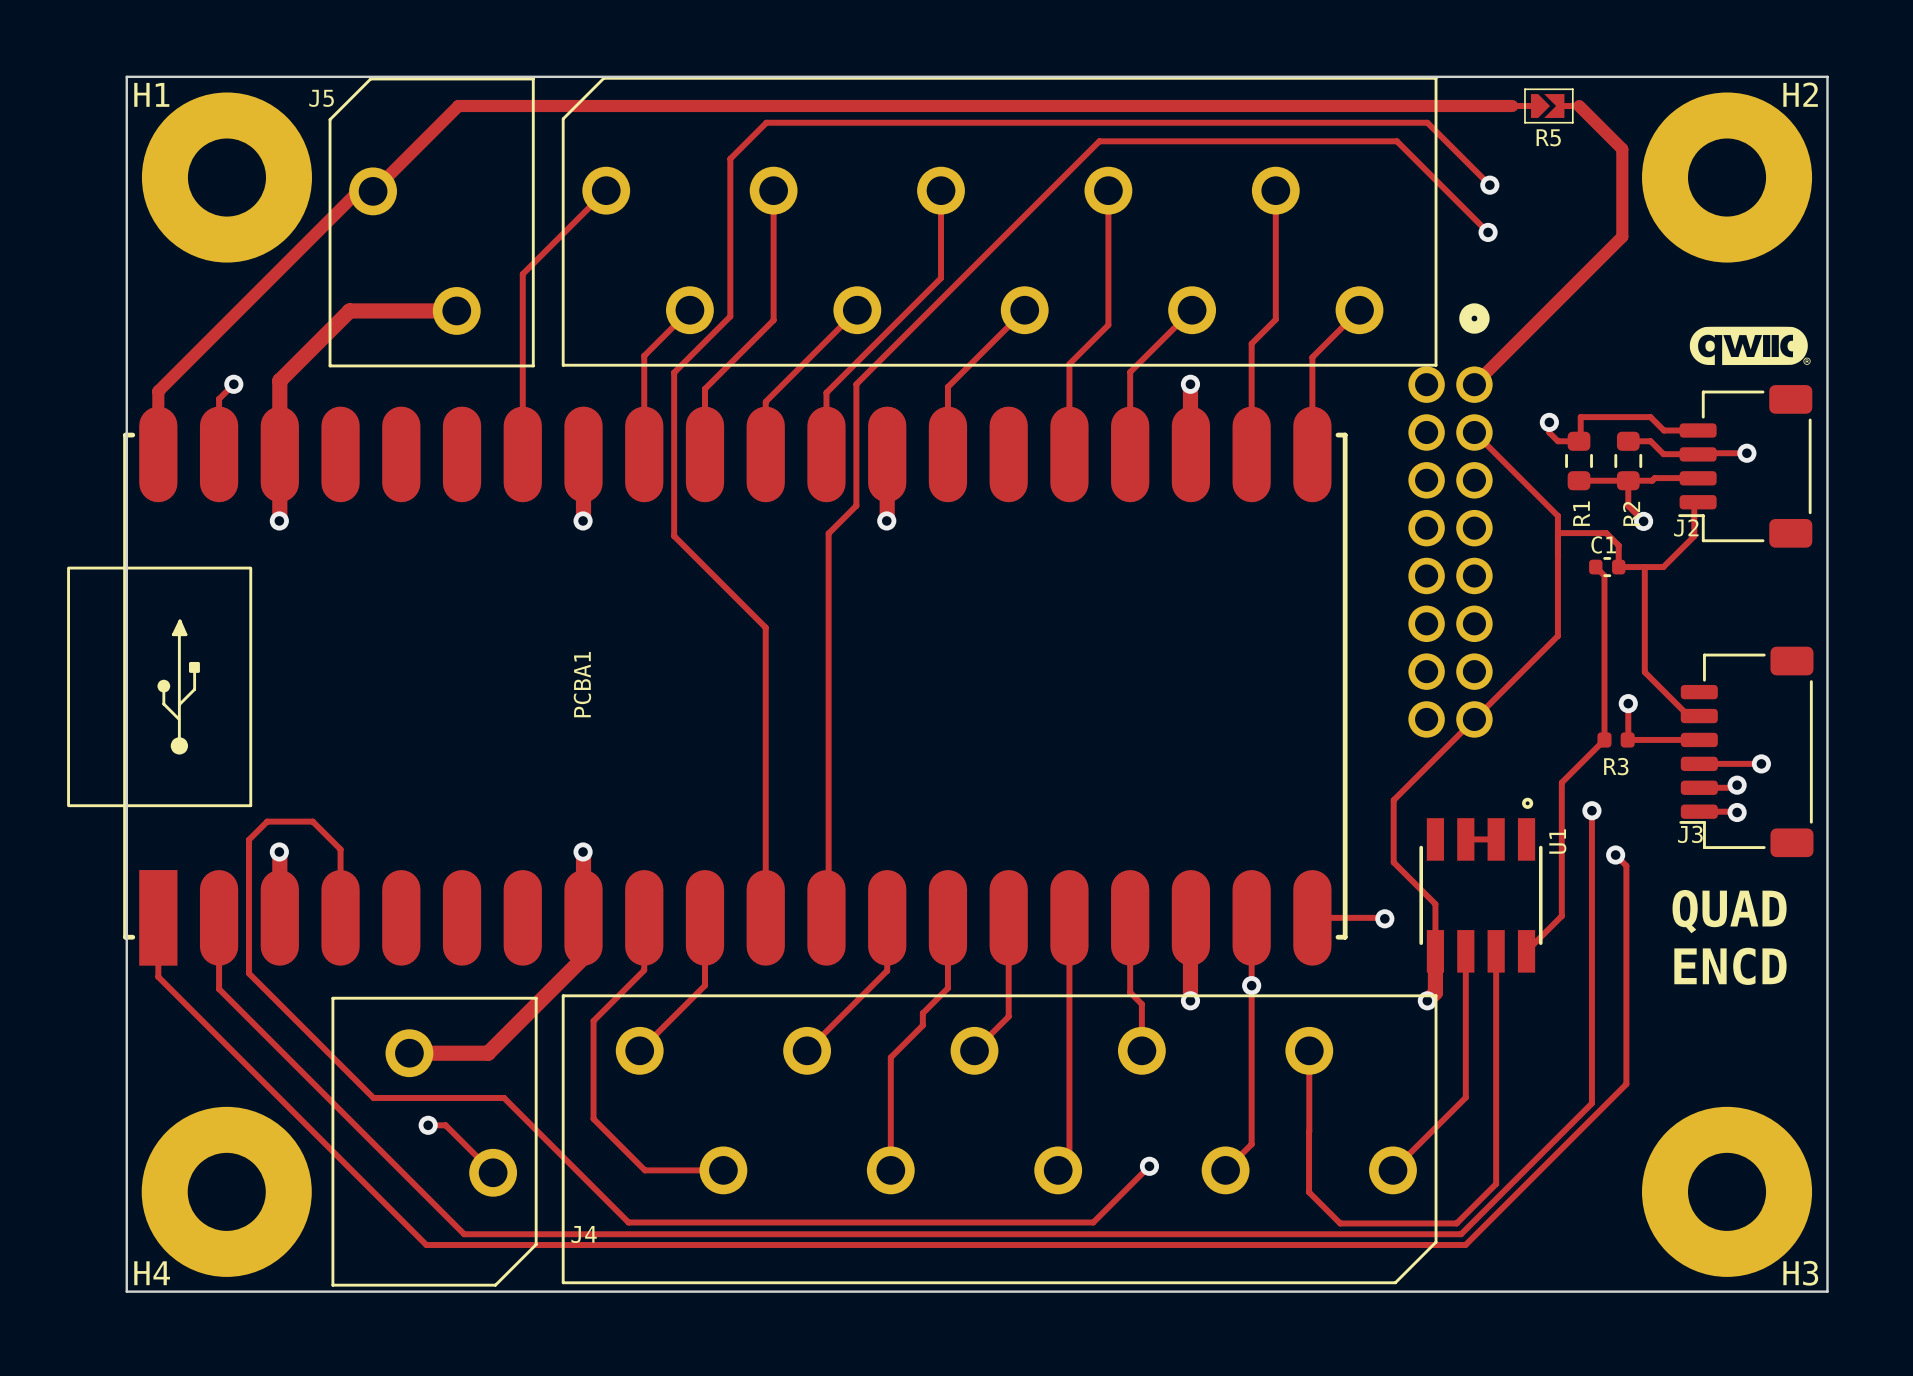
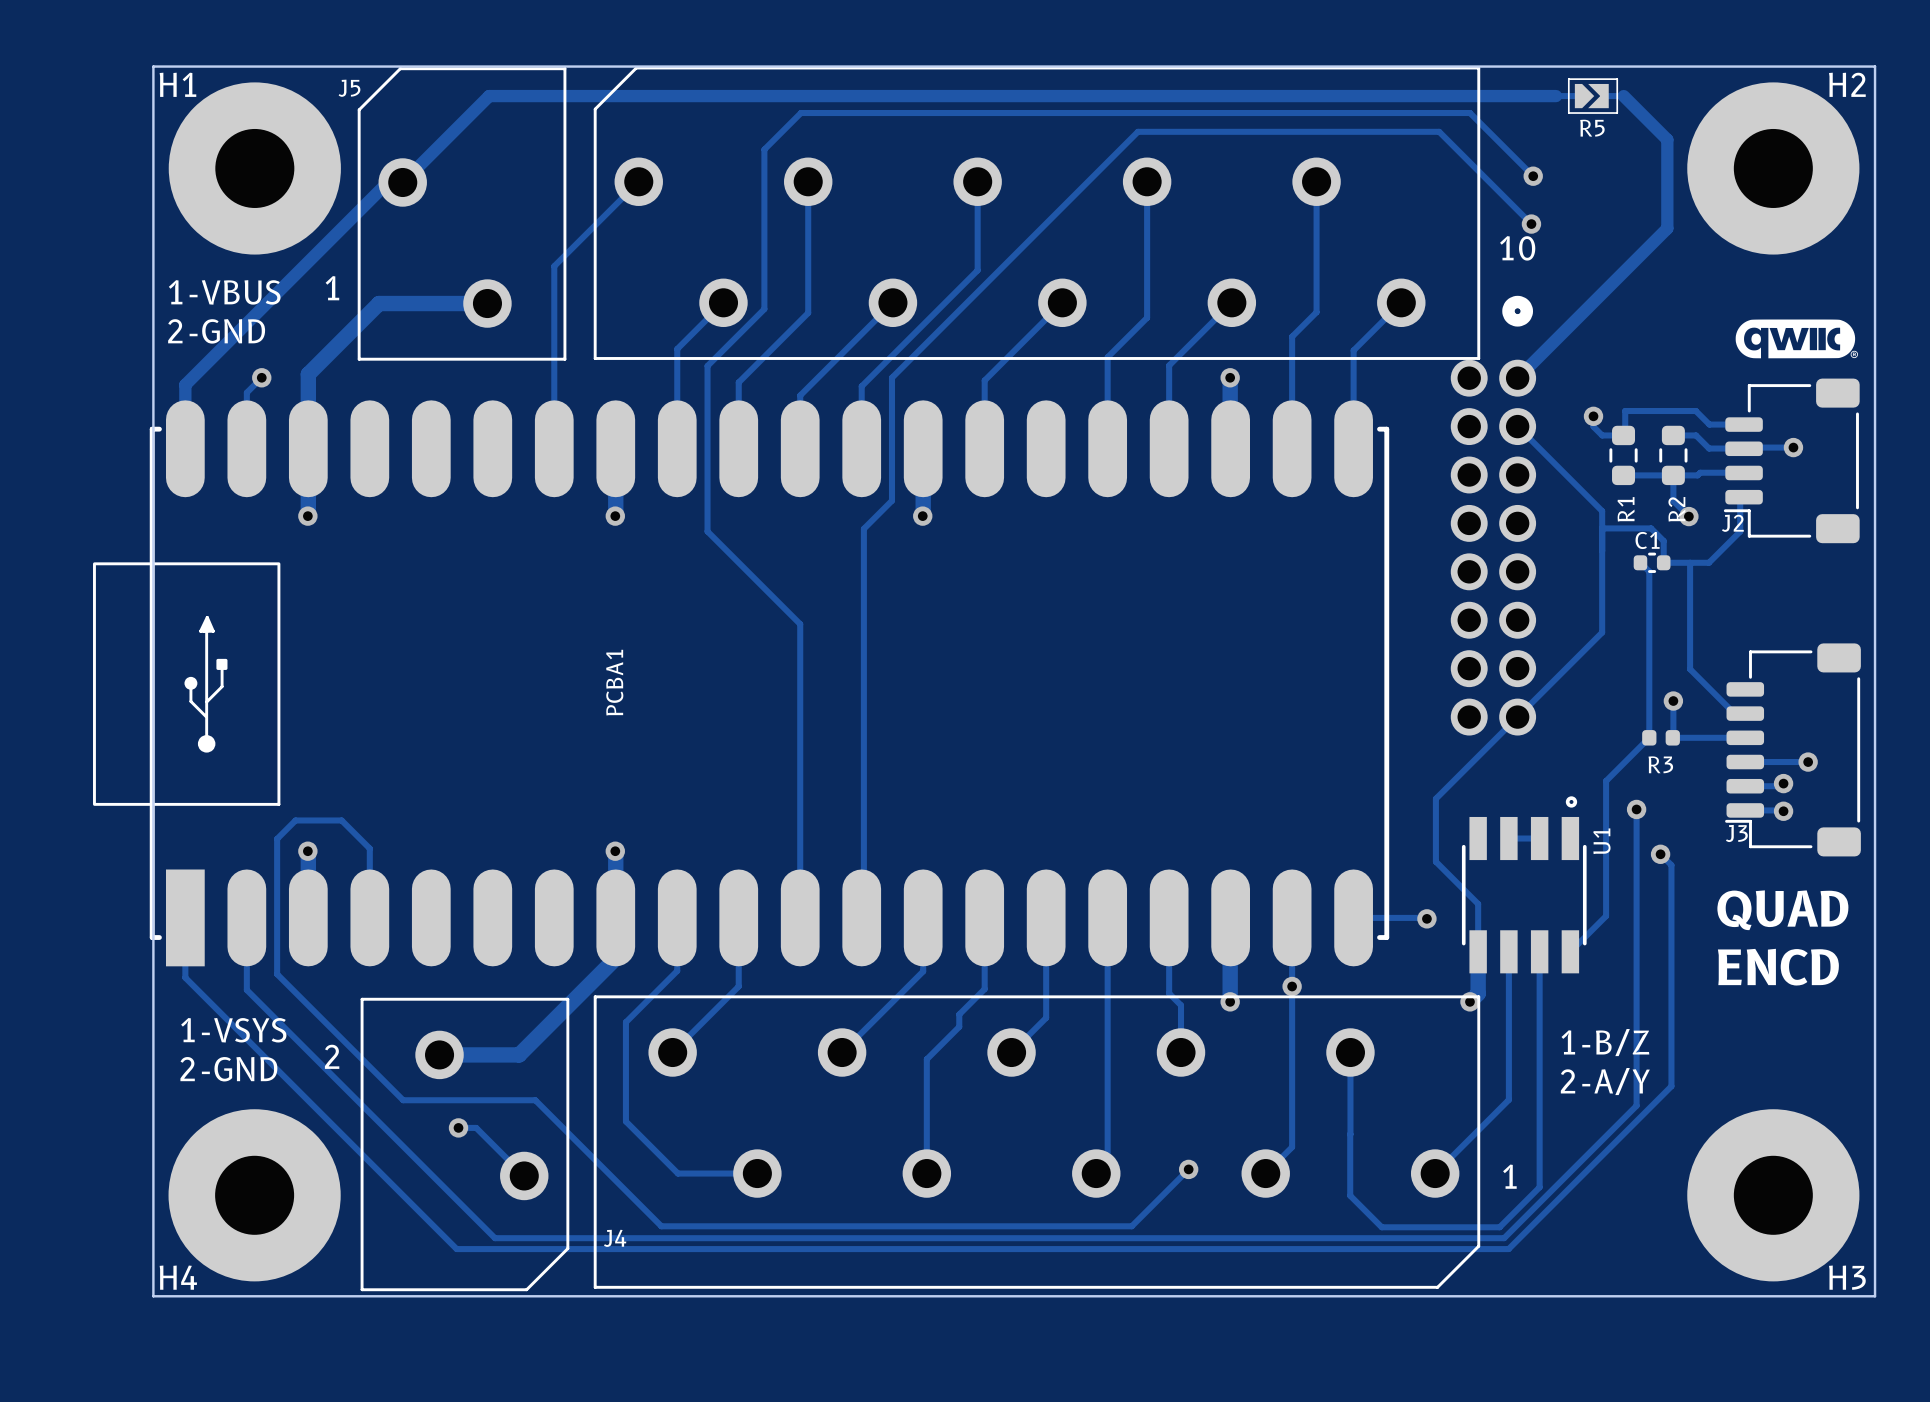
text: none -> 10 (1517, 248)
text: none -> 1 (332, 288)
text: none -> 1-VBUS (224, 292)
text: none -> 2-GND (216, 331)
text: none -> 1-VSYS (233, 1030)
text: none -> 1-B/Z (1605, 1042)
text: none -> 2 (332, 1056)
text: none -> 2-GND (228, 1069)
text: none -> 2-A/Y (1605, 1081)
text: none -> 1 (1509, 1176)

